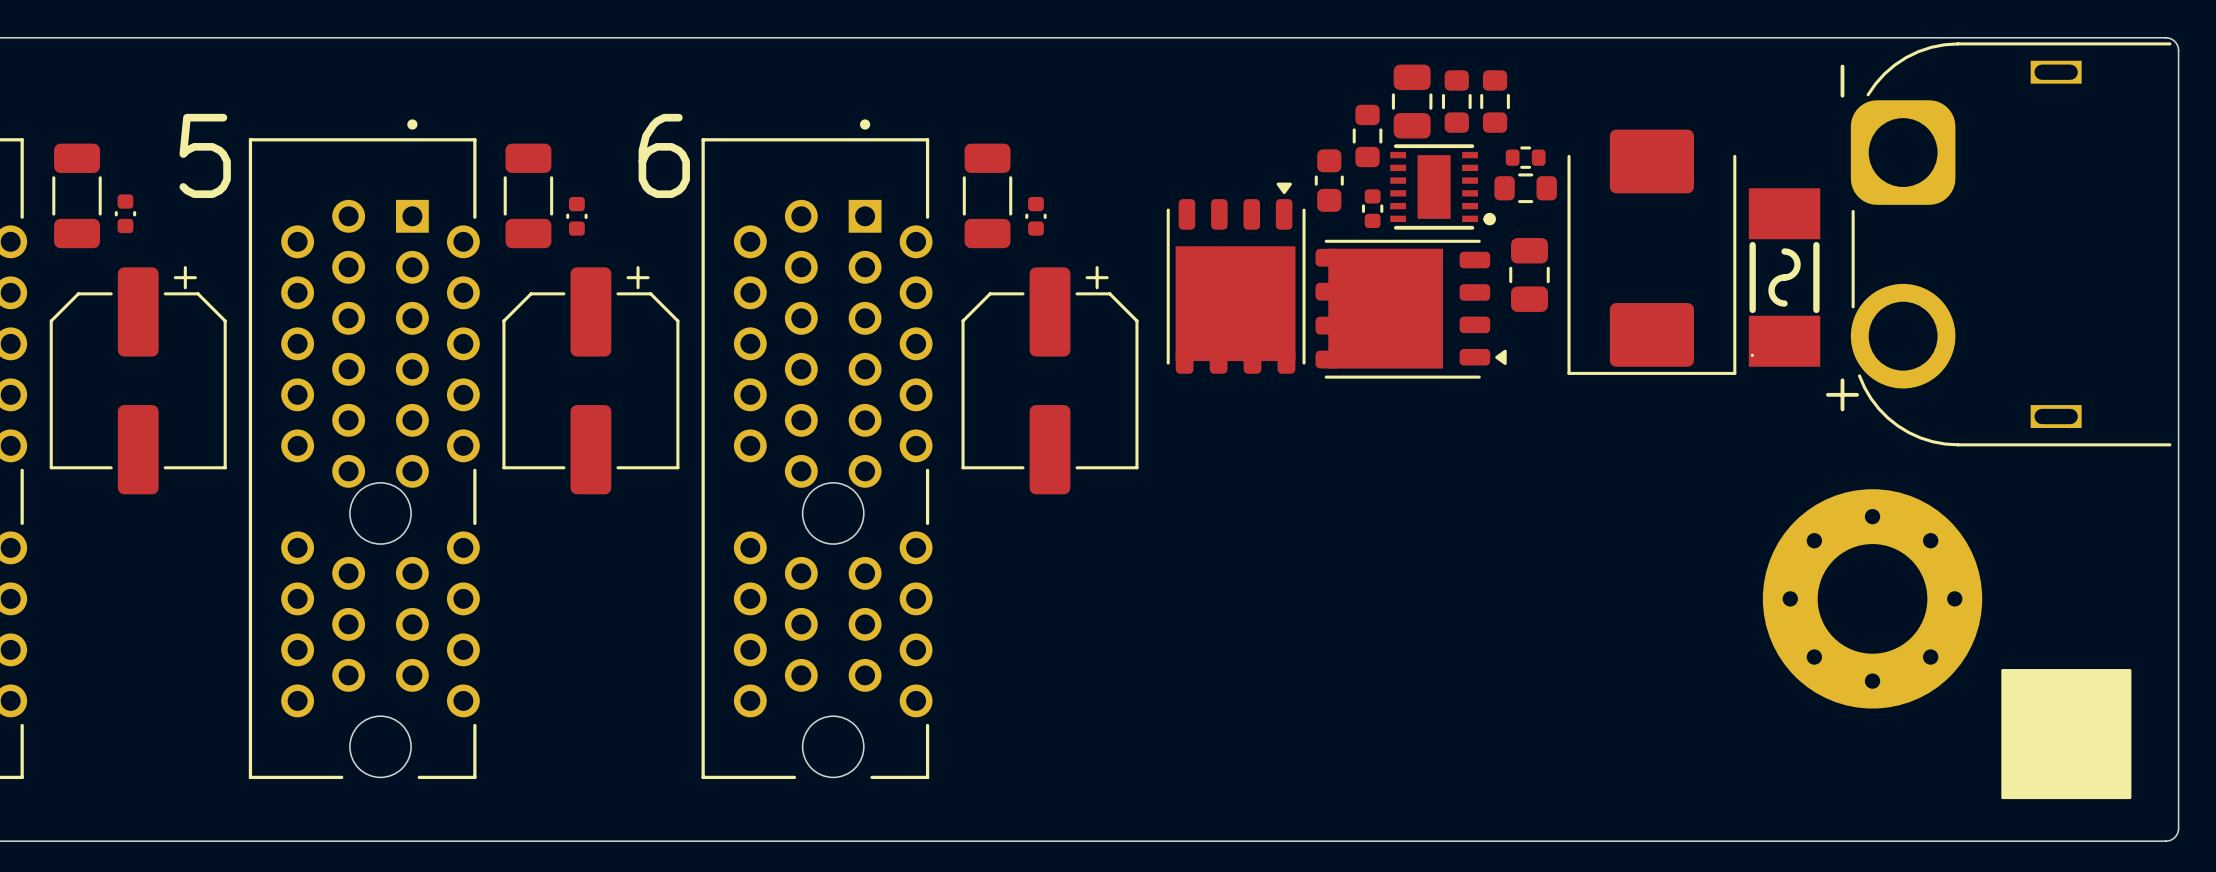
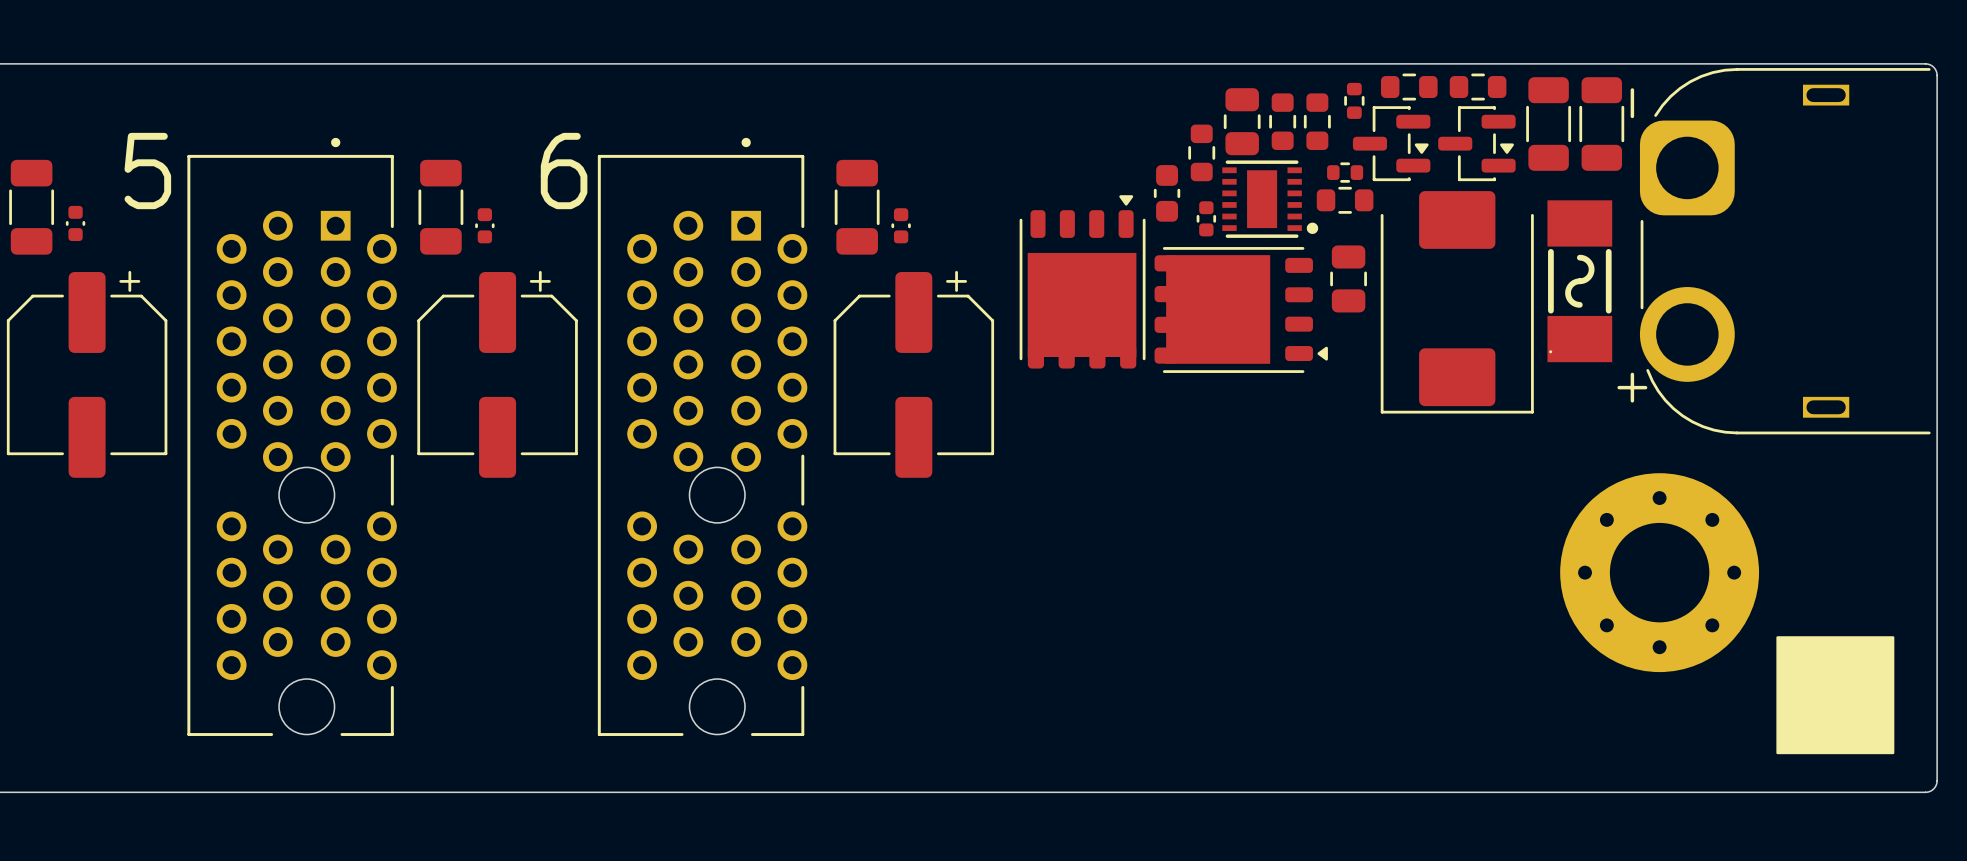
part: none -> (1409, 87)
part: none -> (1478, 87)
part: none -> (1354, 100)
part: none -> (1548, 124)
part: none -> (1601, 124)
part: none -> (1391, 143)
part: none -> (1476, 143)
part position: (1651, 252) -> (1457, 302)

